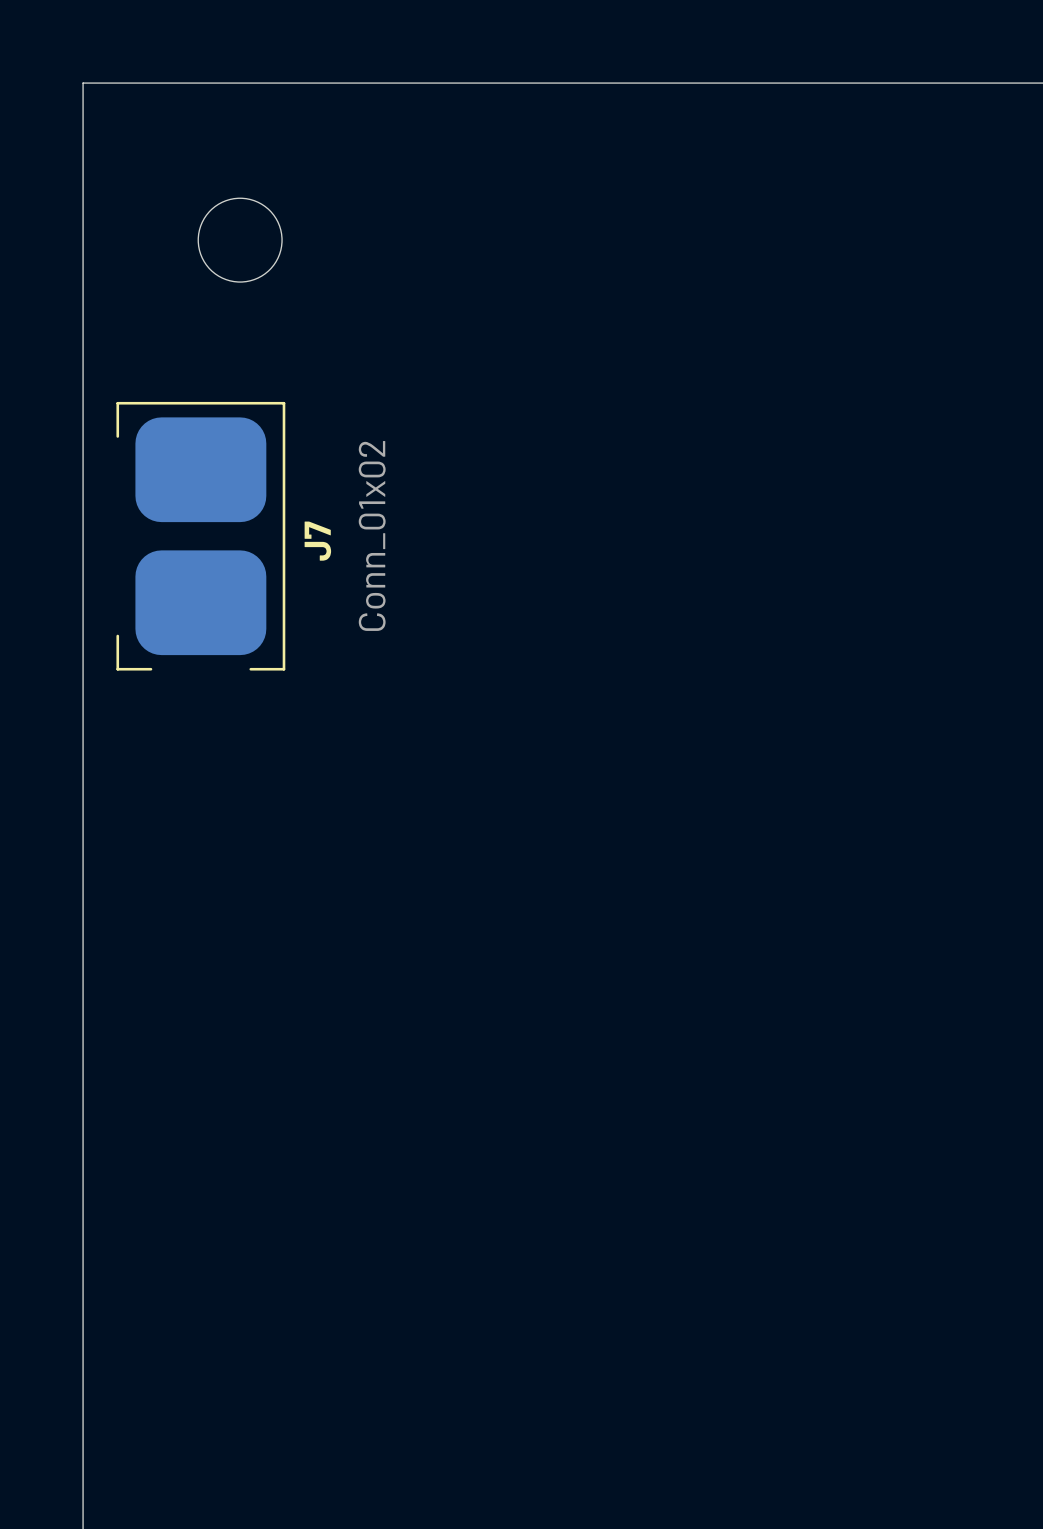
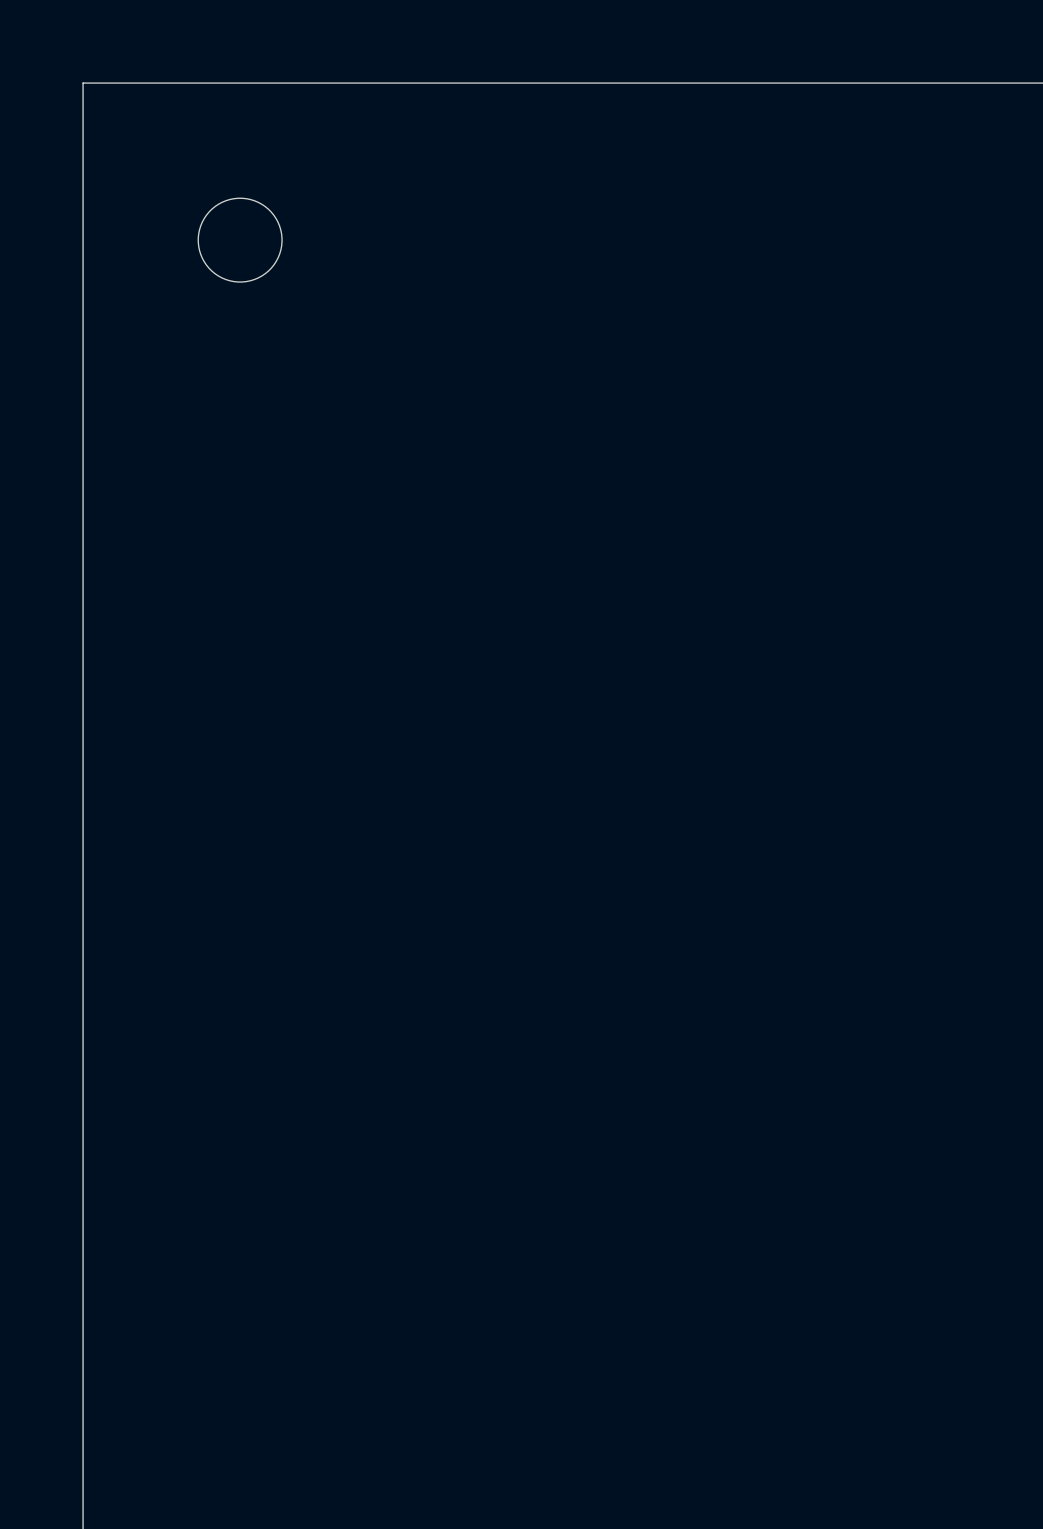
J7: Conn_01x02 (200, 536) -> none

